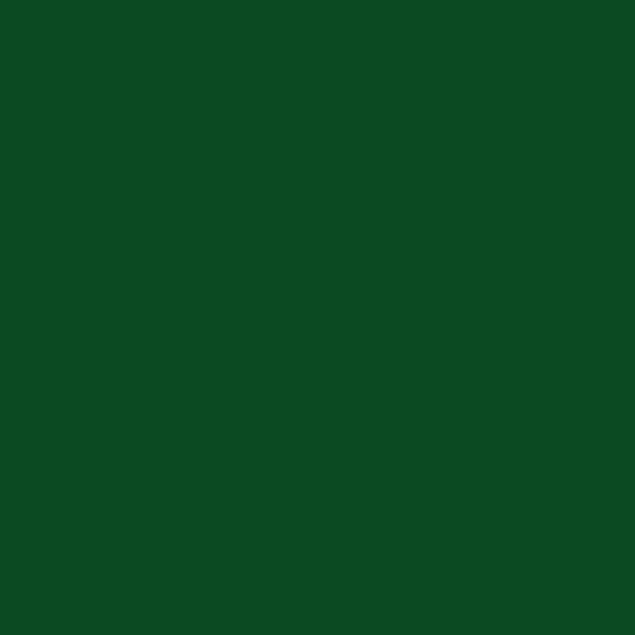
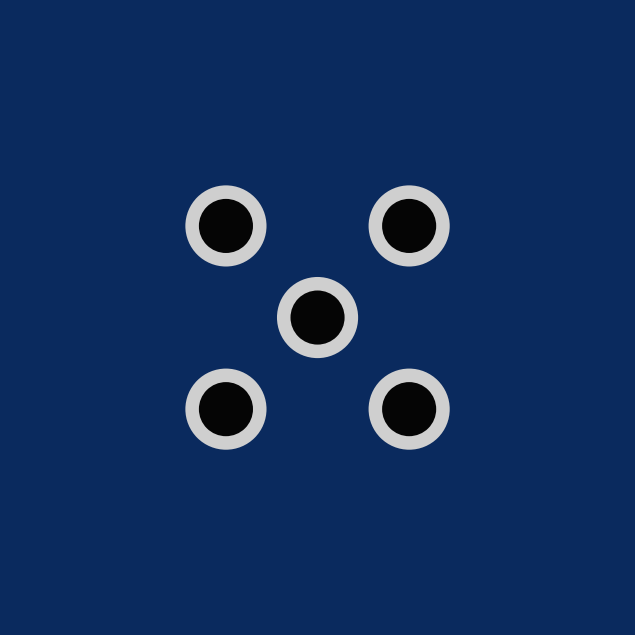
part: none -> (317, 317)

